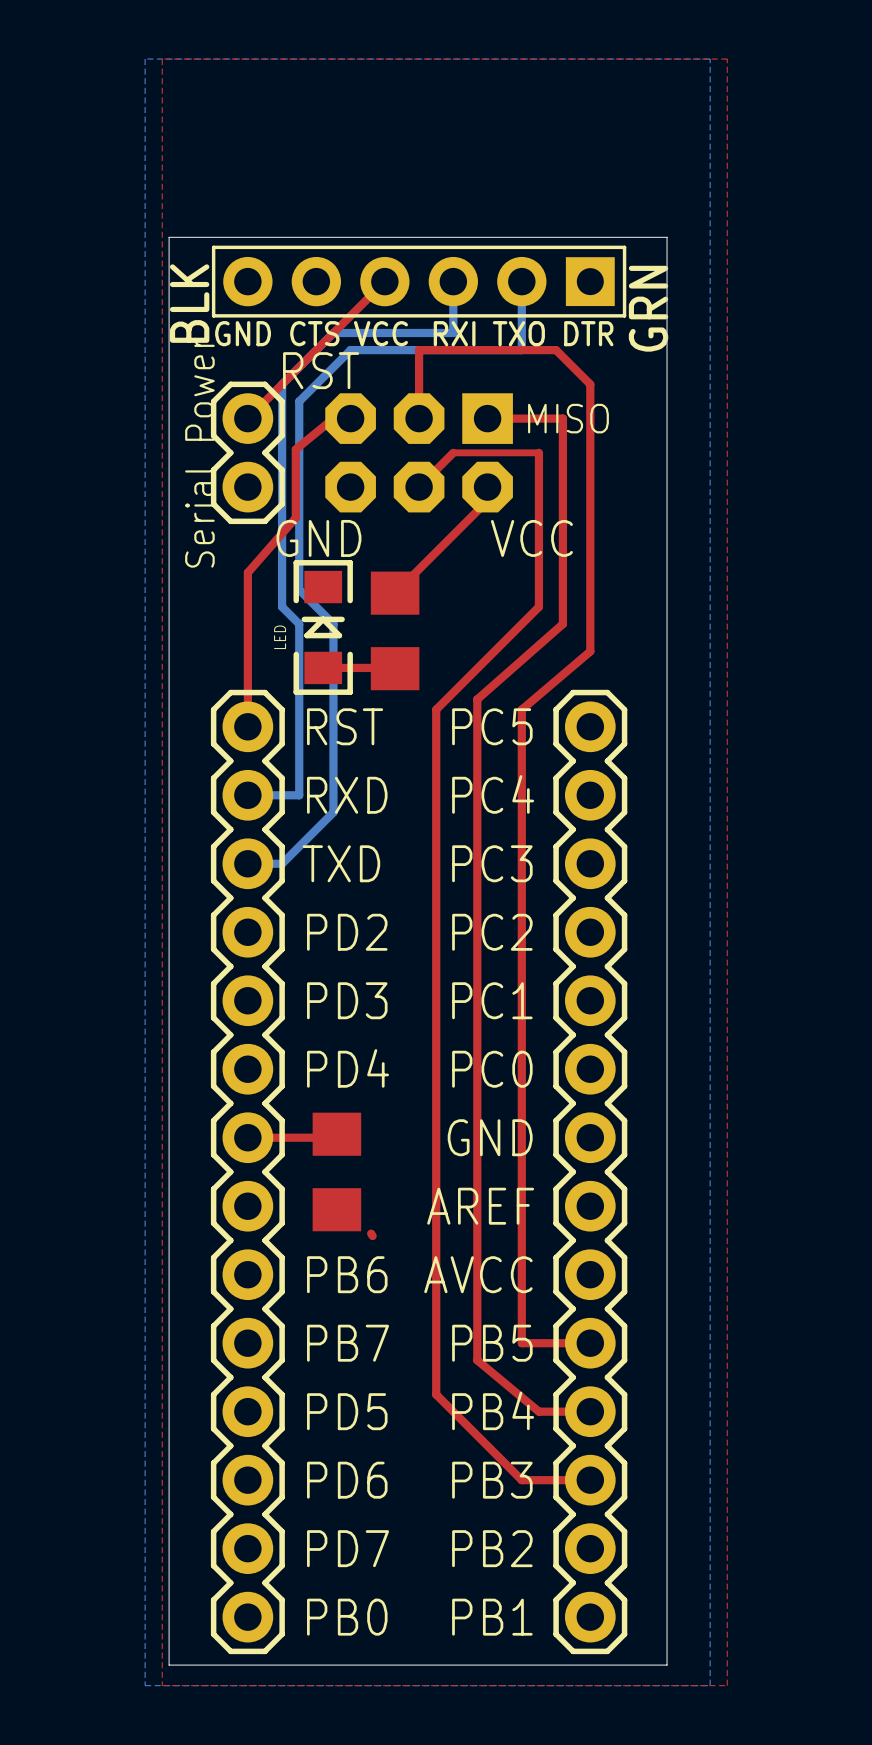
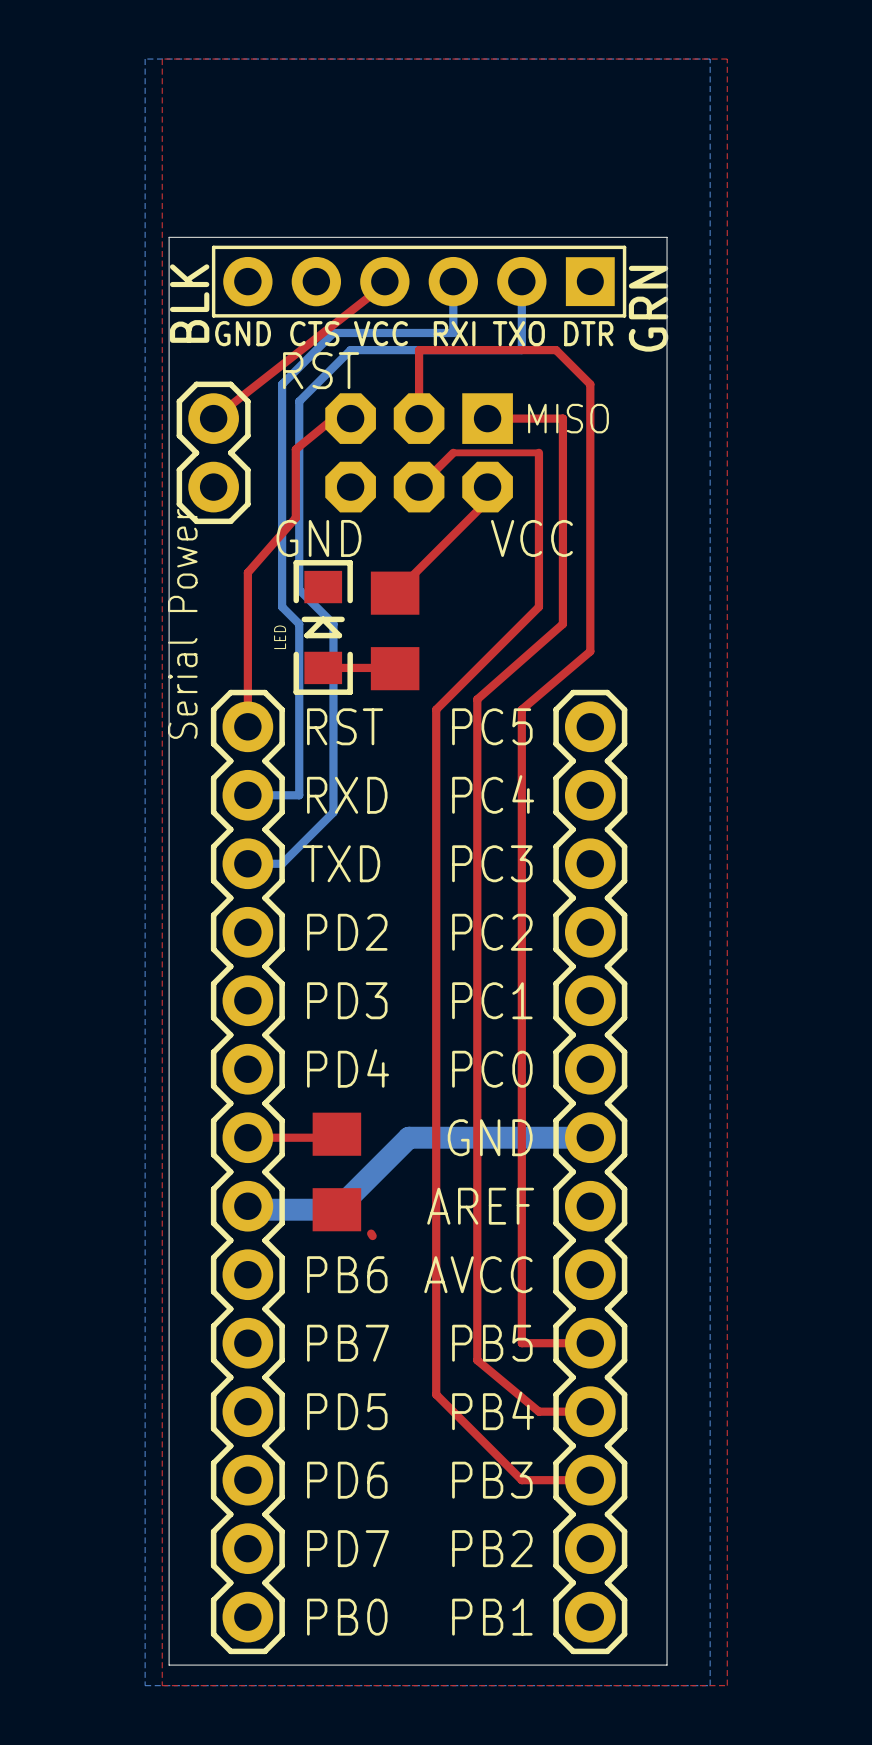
top track: (371, 295) (247, 418) -> (371, 295) (213, 418)
text position: Serial Power (199, 452) -> Serial Power (182, 623)
part position: (247, 452) -> (213, 452)
bottom track: none -> (590, 1137) (408, 1137) (336, 1209) (251, 1209) (247, 1206)

